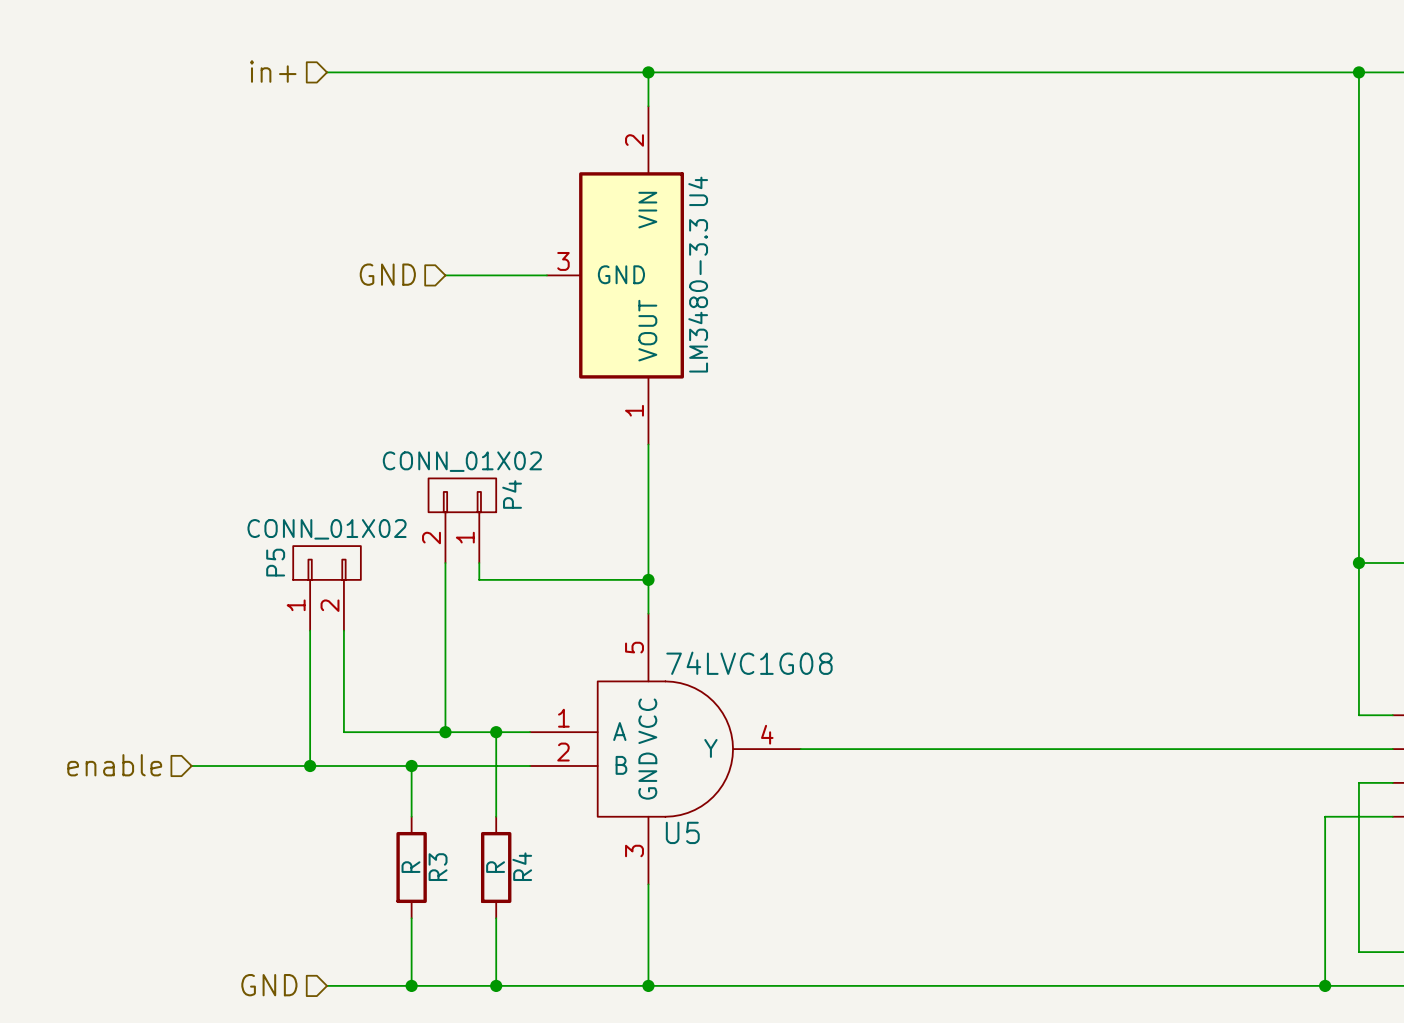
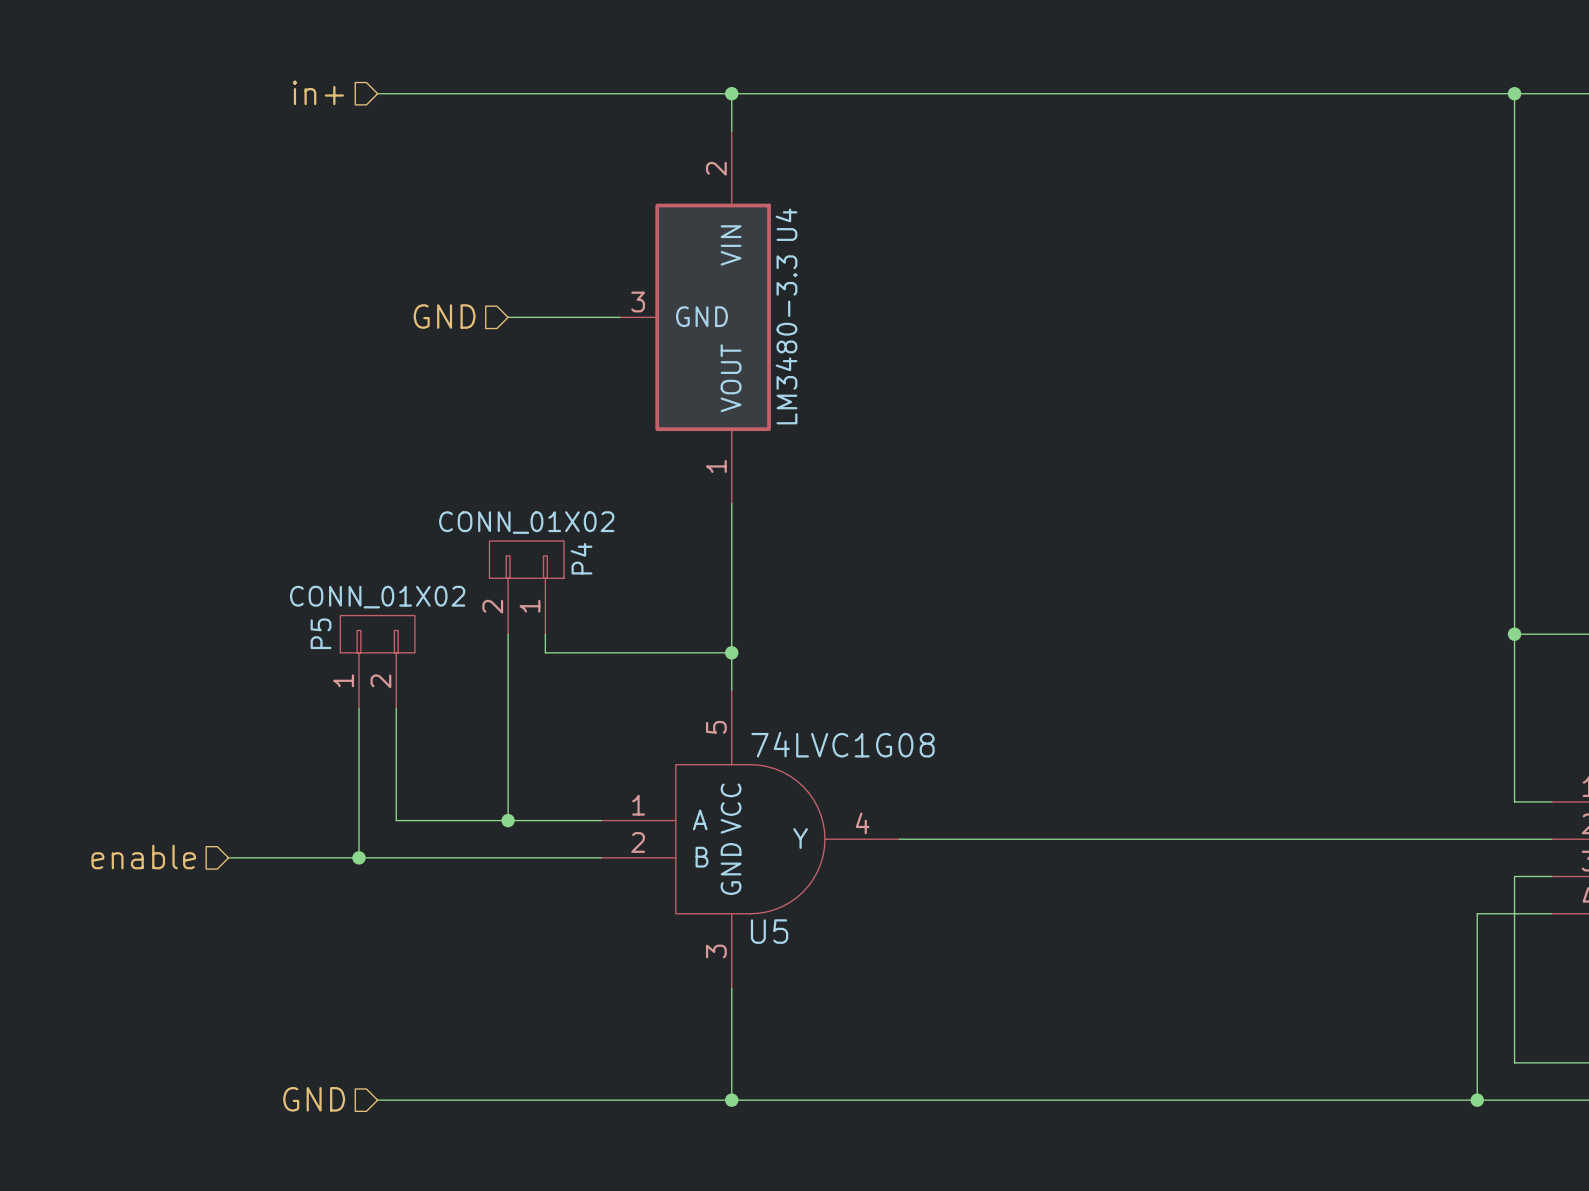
wire: (496, 732) (496, 816) -> none
junction: (496, 732) -> none
wire: (411, 766) (411, 816) -> none
junction: (411, 766) -> none
R3: R (411, 867) -> none
R4: R (496, 867) -> none
wire: (411, 918) (411, 985) -> none
wire: (496, 918) (496, 985) -> none
junction: (411, 985) -> none
junction: (496, 985) -> none

